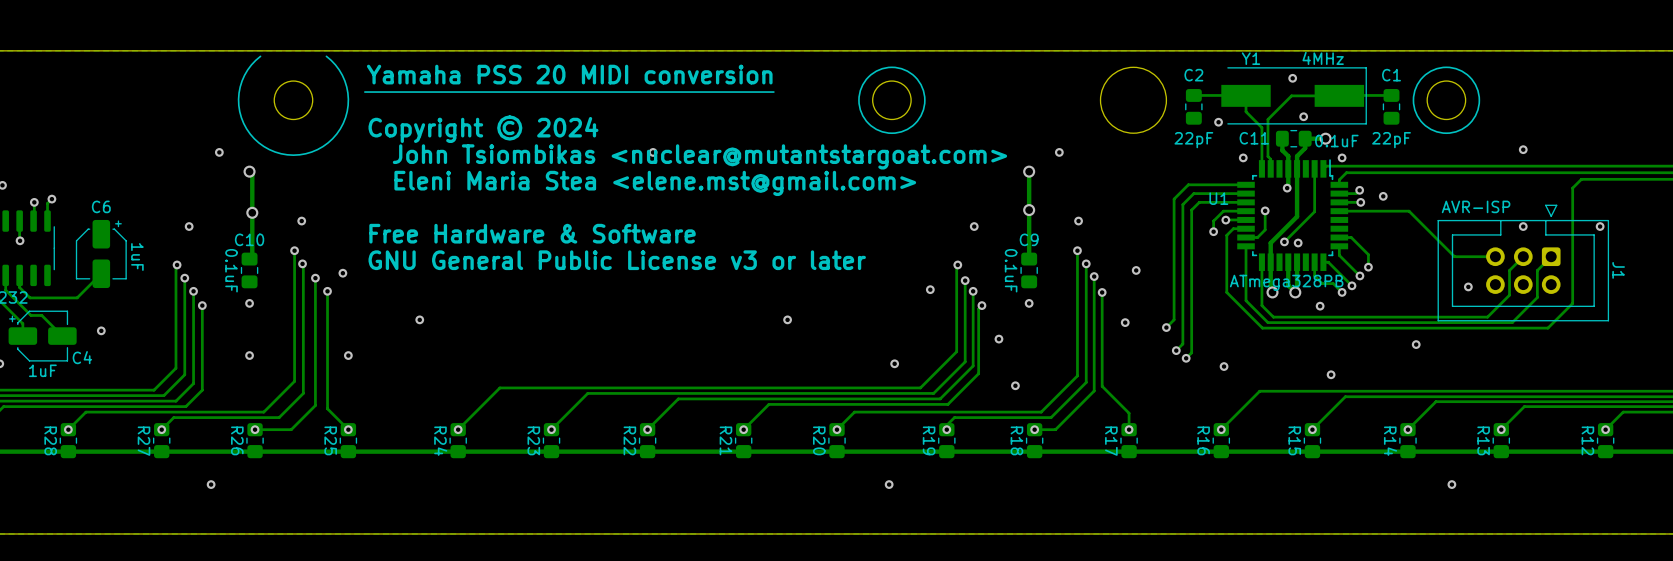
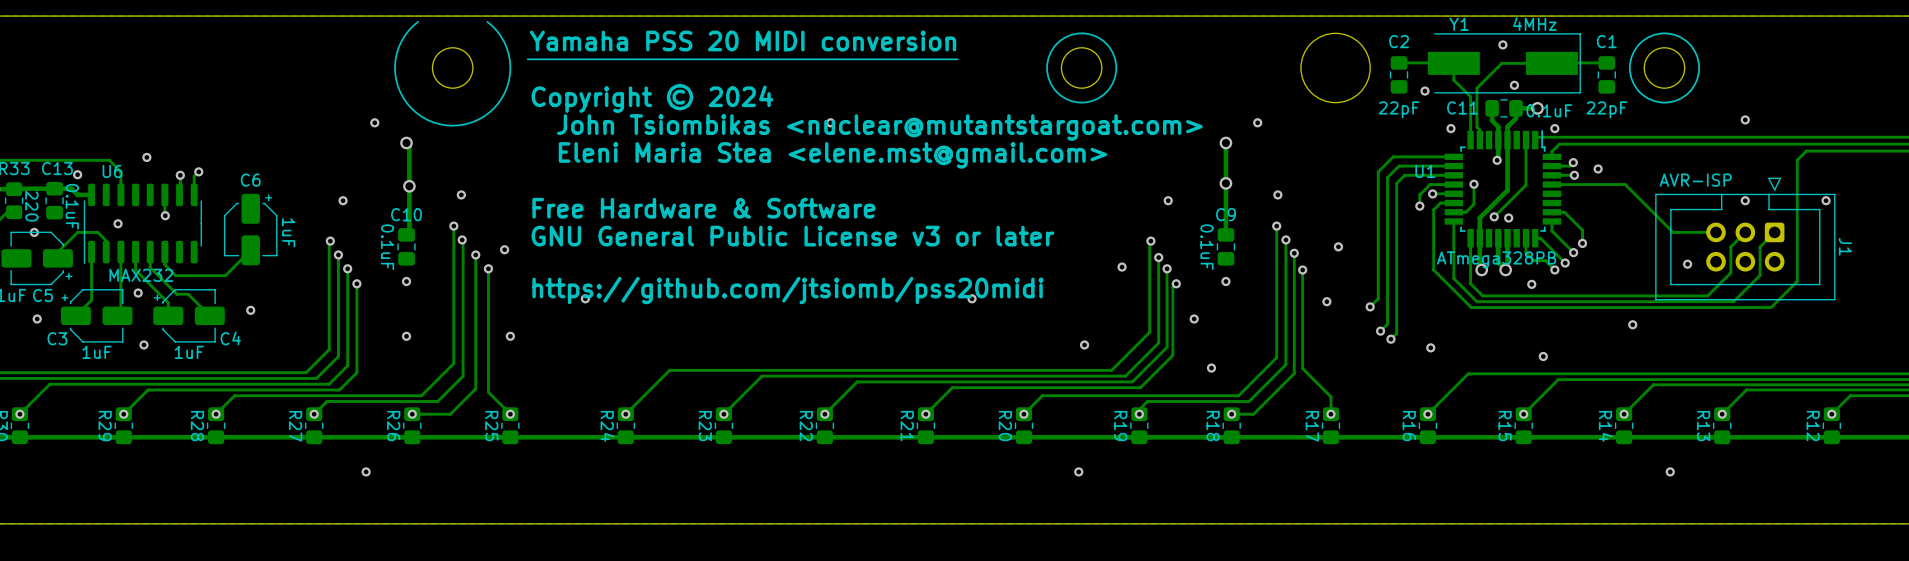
text: none -> https://github.com/jtsiomb/pss20midi (788, 290)

